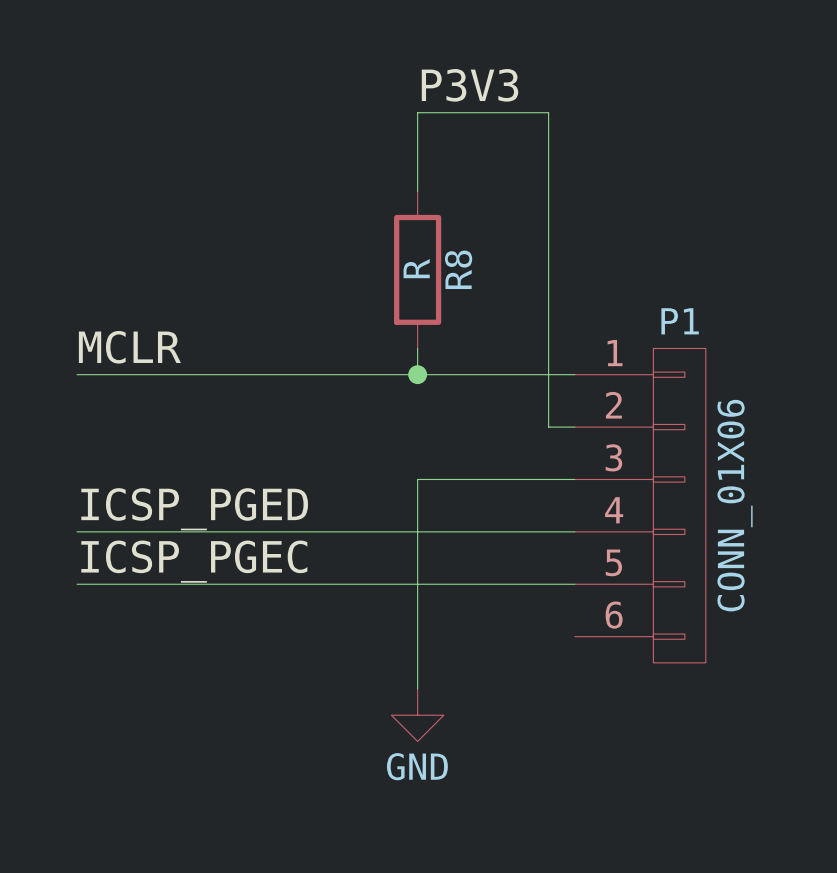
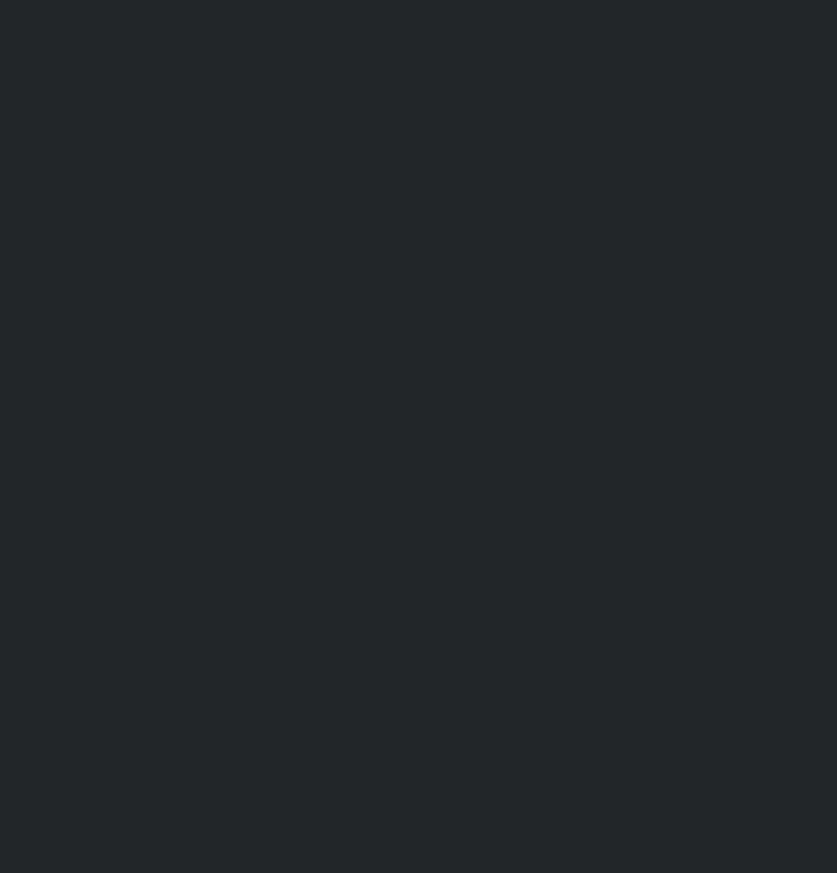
label: P3V3 (470, 85) -> none
wire: (417, 191) (417, 112) (548, 112) (548, 427) (574, 427) -> none
R8: R (417, 269) -> none
label: MCLR (129, 347) -> none
wire: (417, 348) (417, 374) -> none
wire: (77, 374) (574, 374) -> none
junction: (417, 374) -> none
wire: (574, 479) (417, 479) (417, 689) -> none
P1: CONN_01X06 (640, 505) -> none
label: ICSP_PGED (194, 509) -> none
wire: (77, 531) (574, 531) -> none
label: ICSP_PGEC (194, 561) -> none
wire: (77, 584) (574, 584) -> none
power symbol: GND (417, 715) -> none

